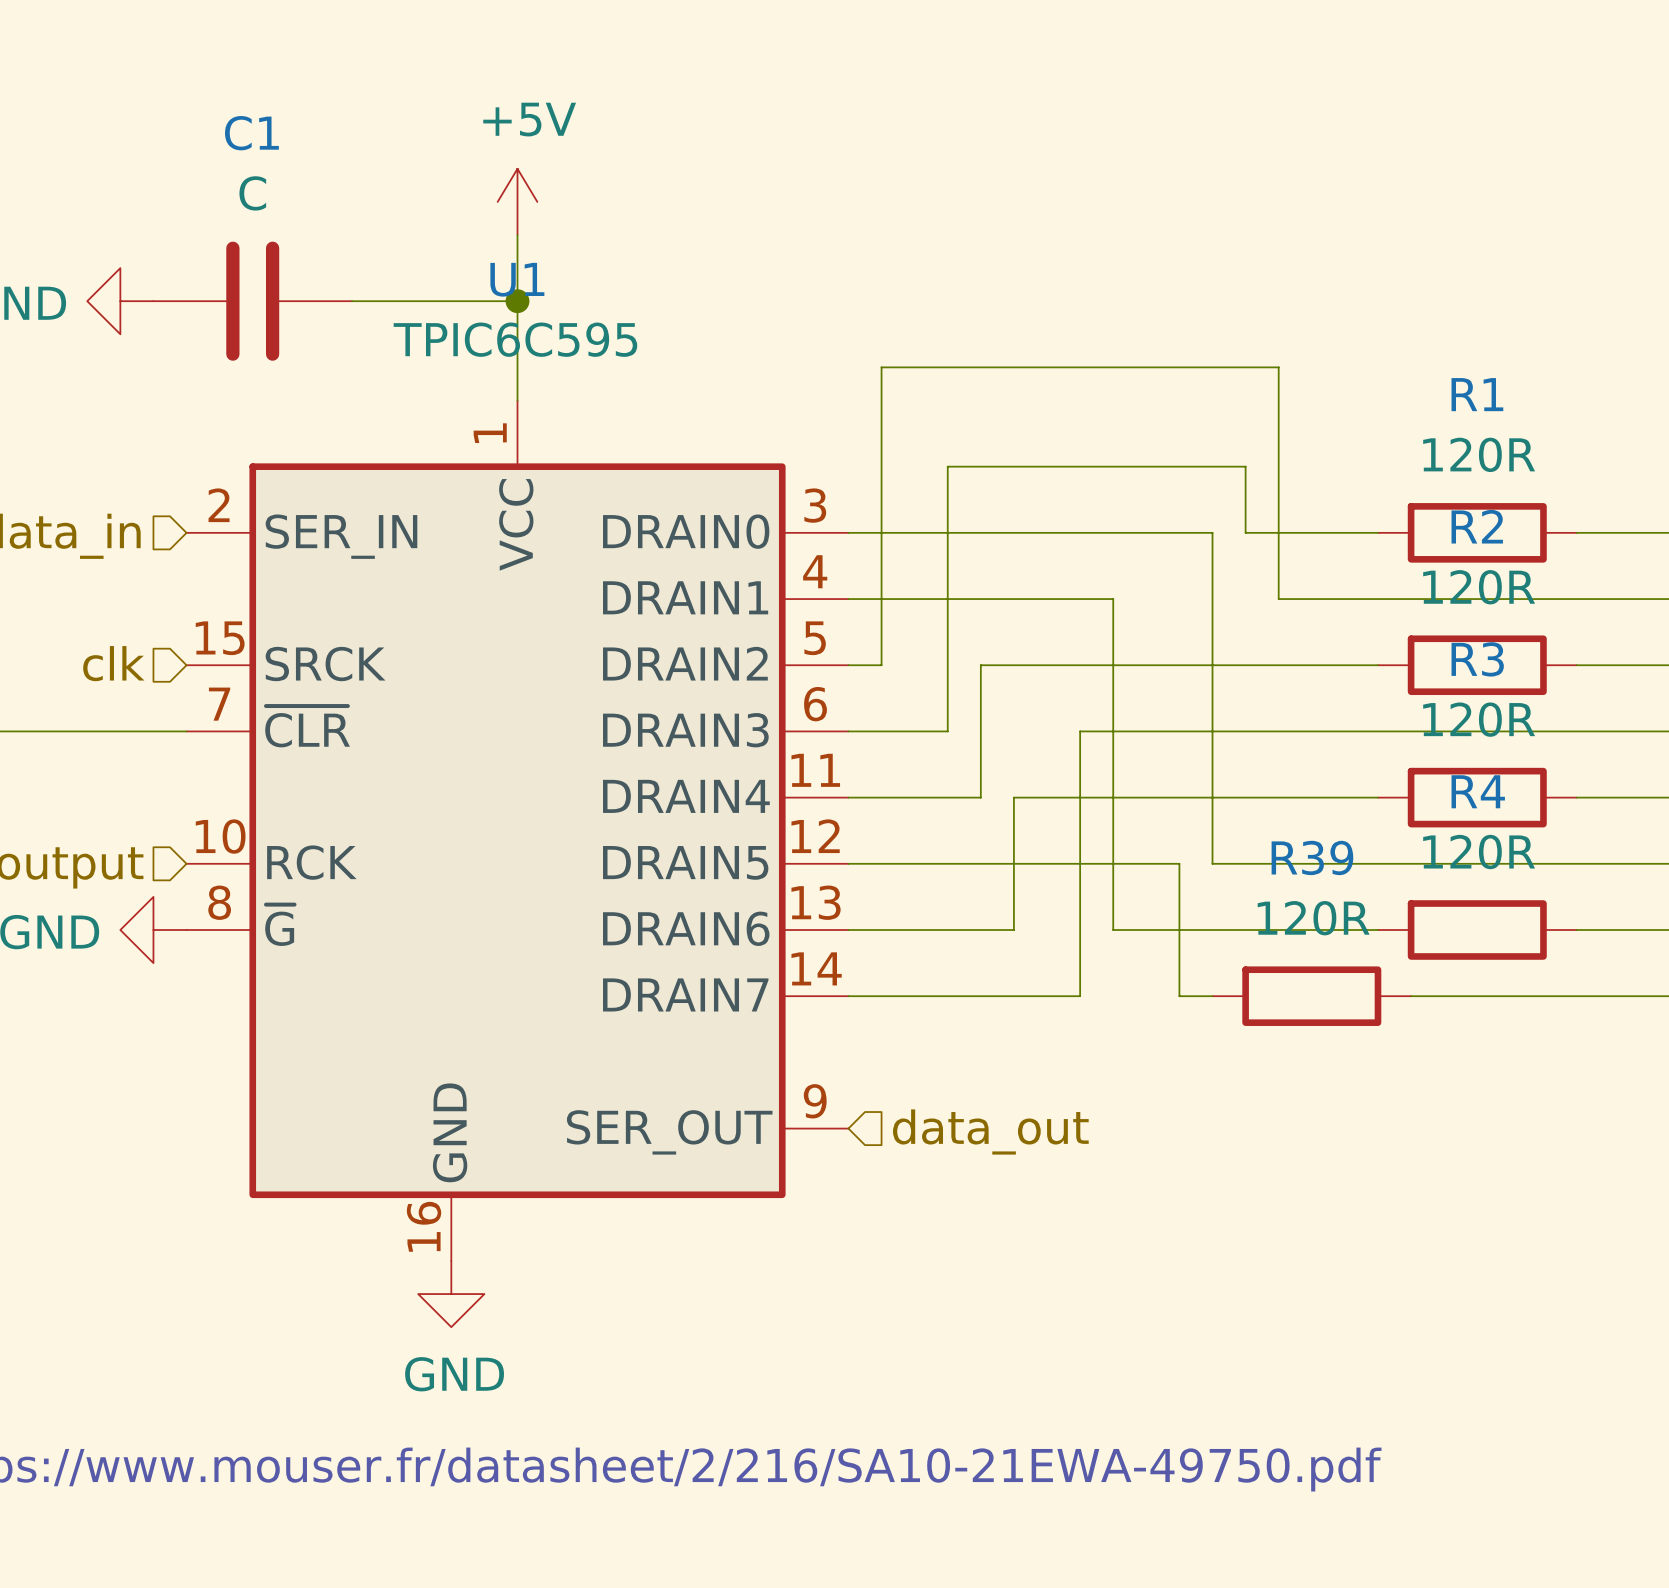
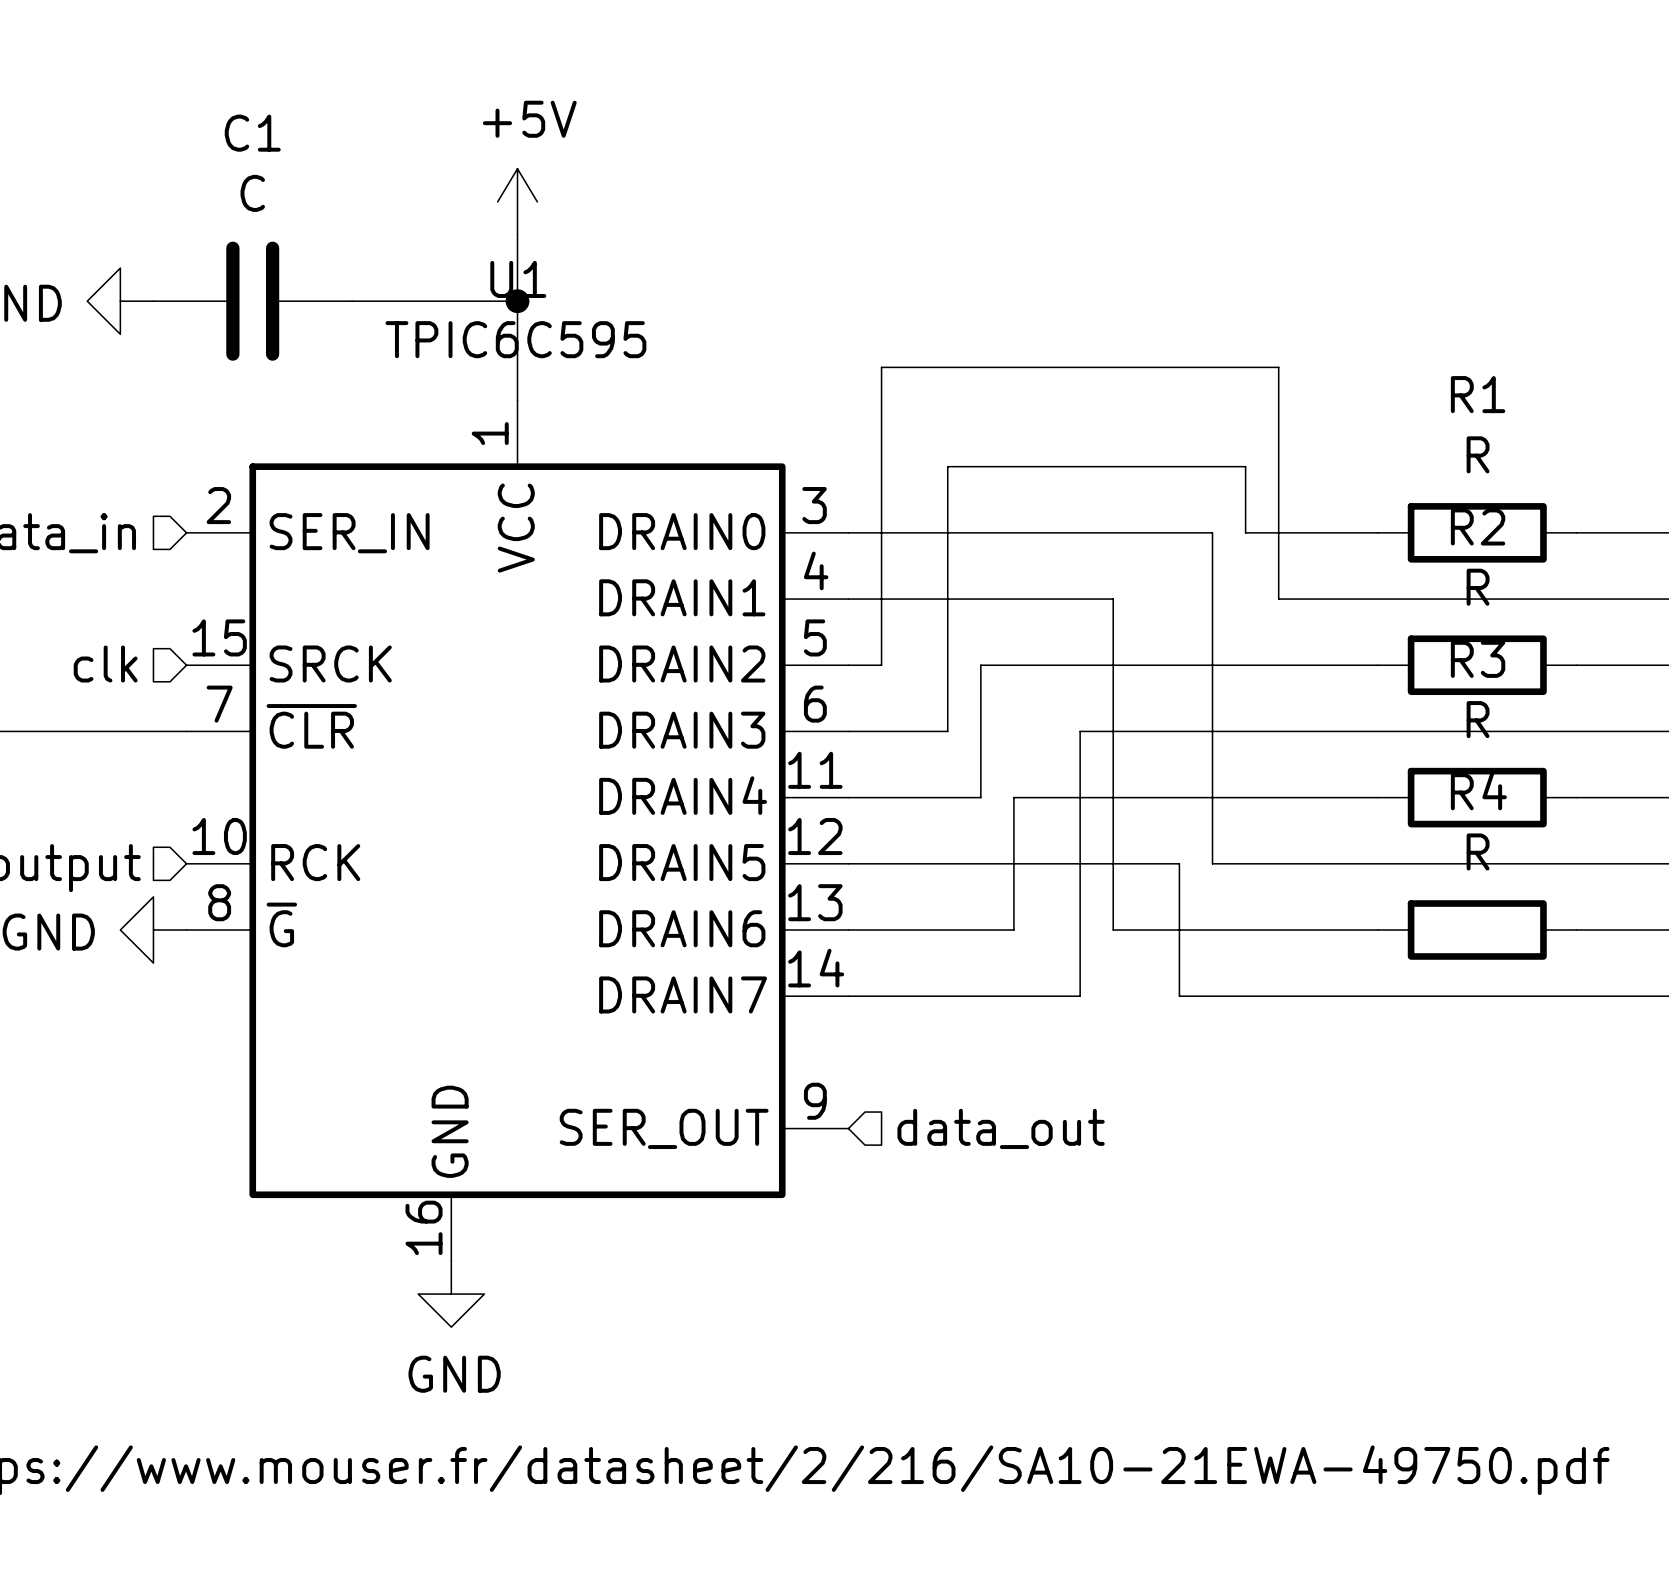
R1 value: 120R (1479, 454) -> R (1478, 454)
R2 value: 120R (1479, 587) -> R (1478, 587)
R3 value: 120R (1479, 719) -> R (1478, 719)
R4 value: 120R (1479, 852) -> R (1478, 851)
wire: none -> (1212, 996) (1411, 996)
R39: 120R (1311, 996) -> none

